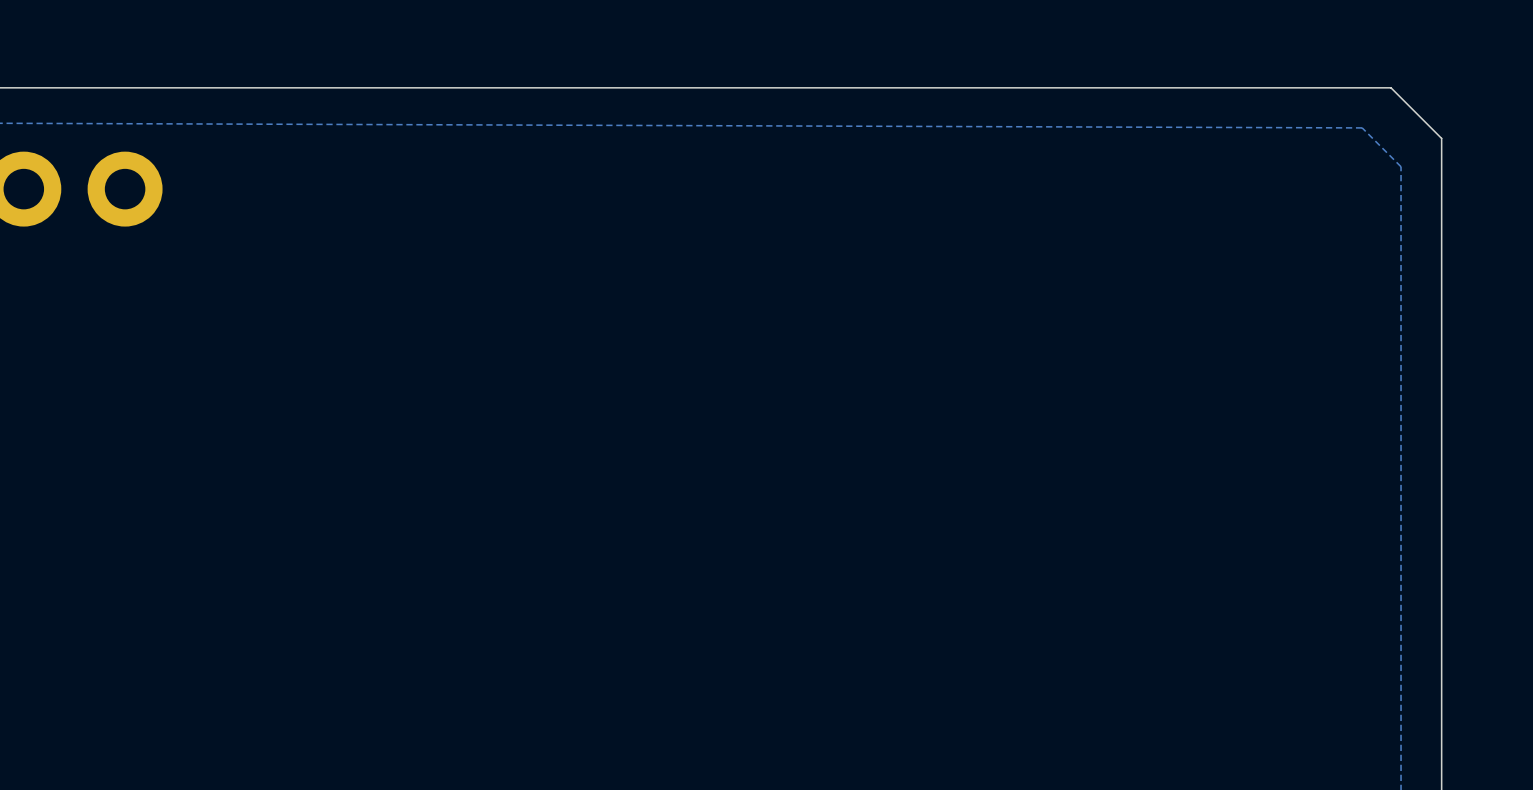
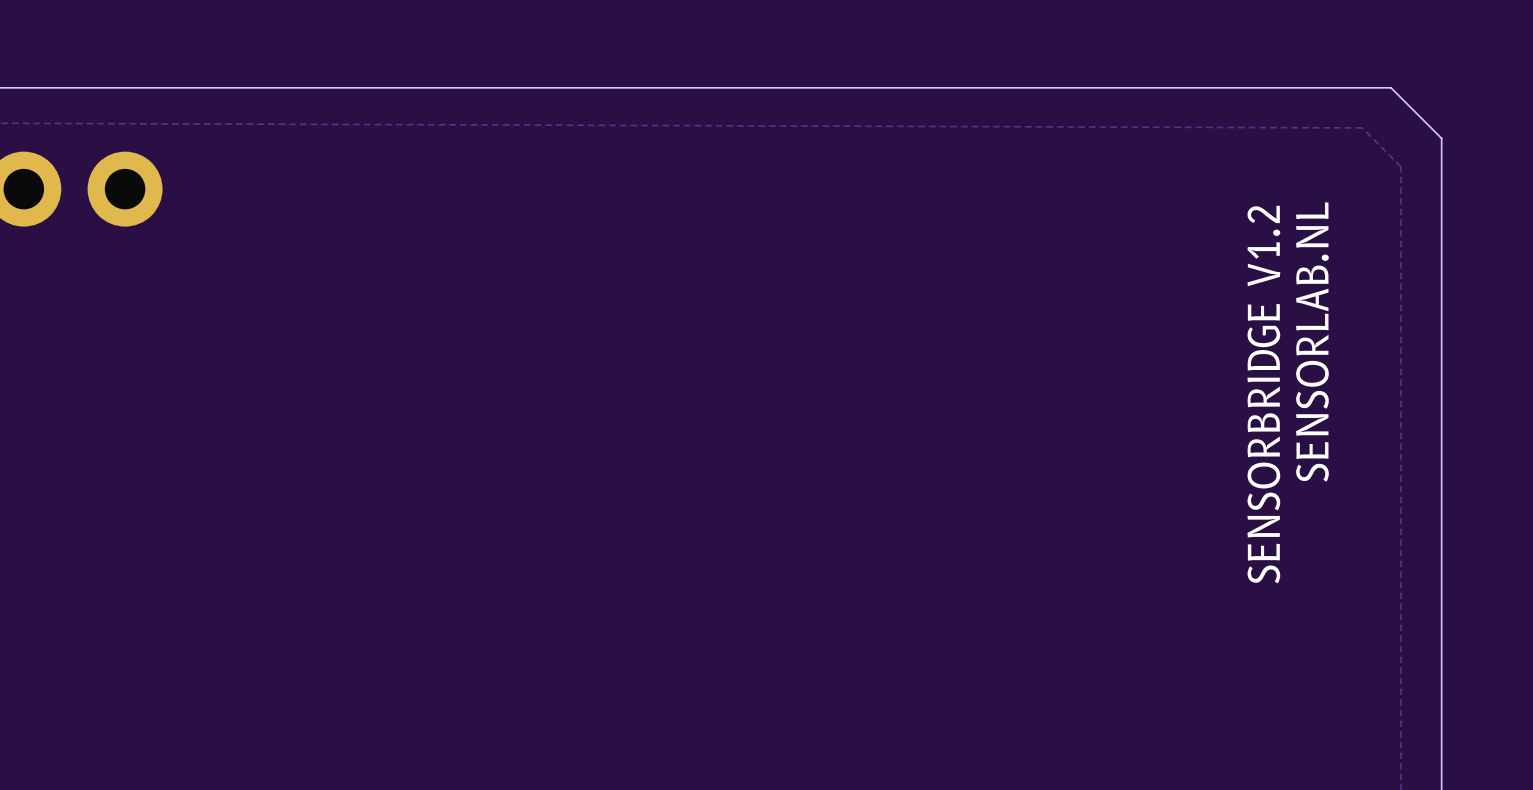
text: none -> SENSORLAB.NL (1312, 341)
text: none -> SENSORBRIDGE V1.2 (1263, 394)

